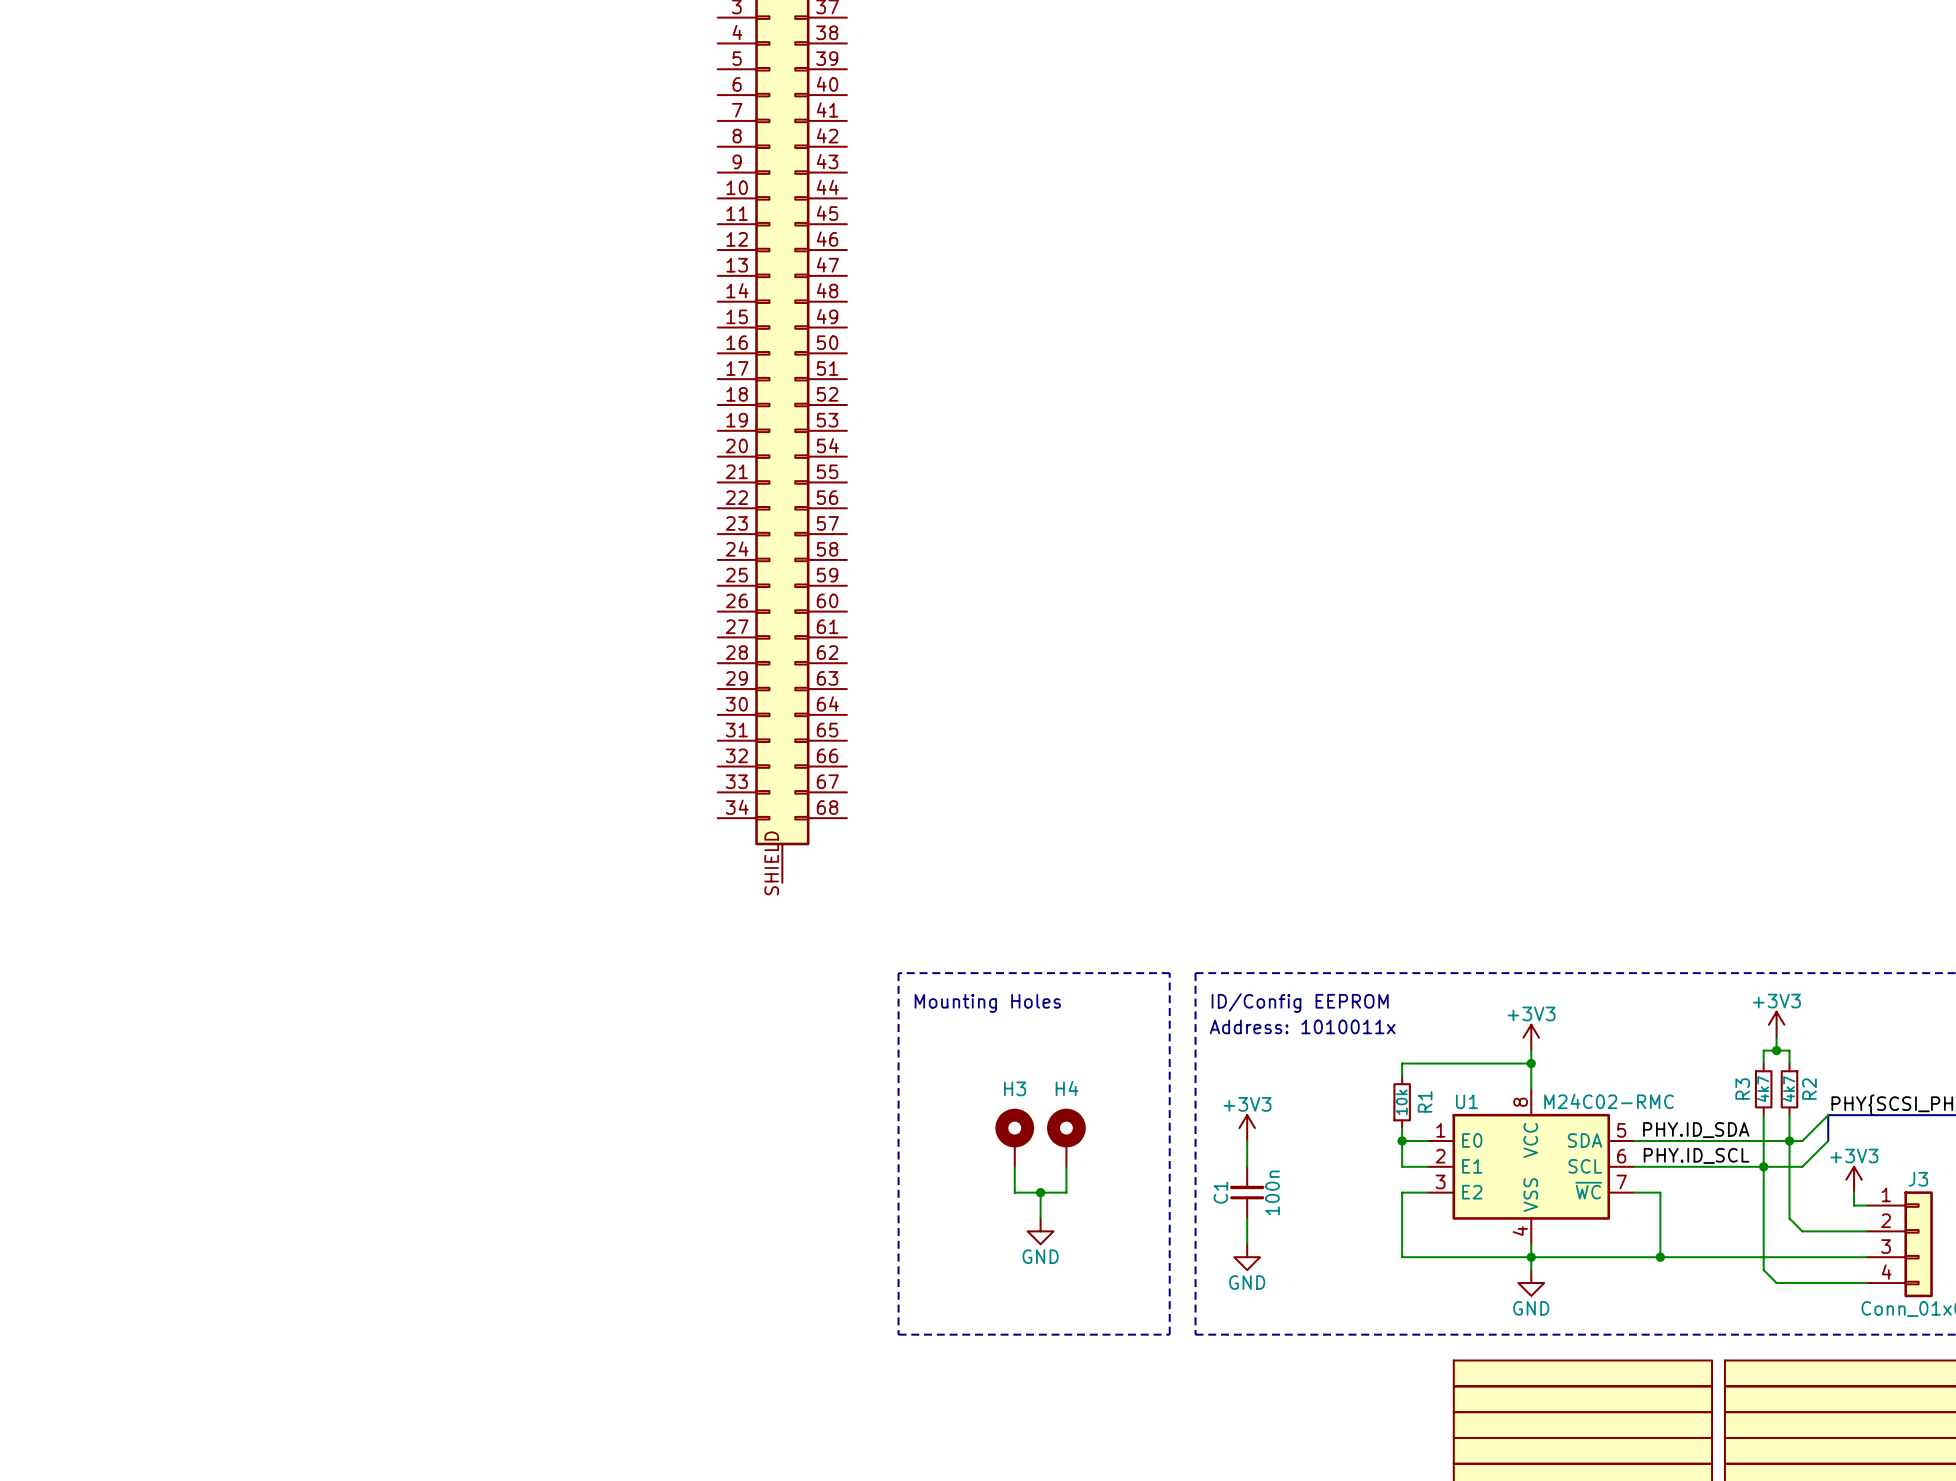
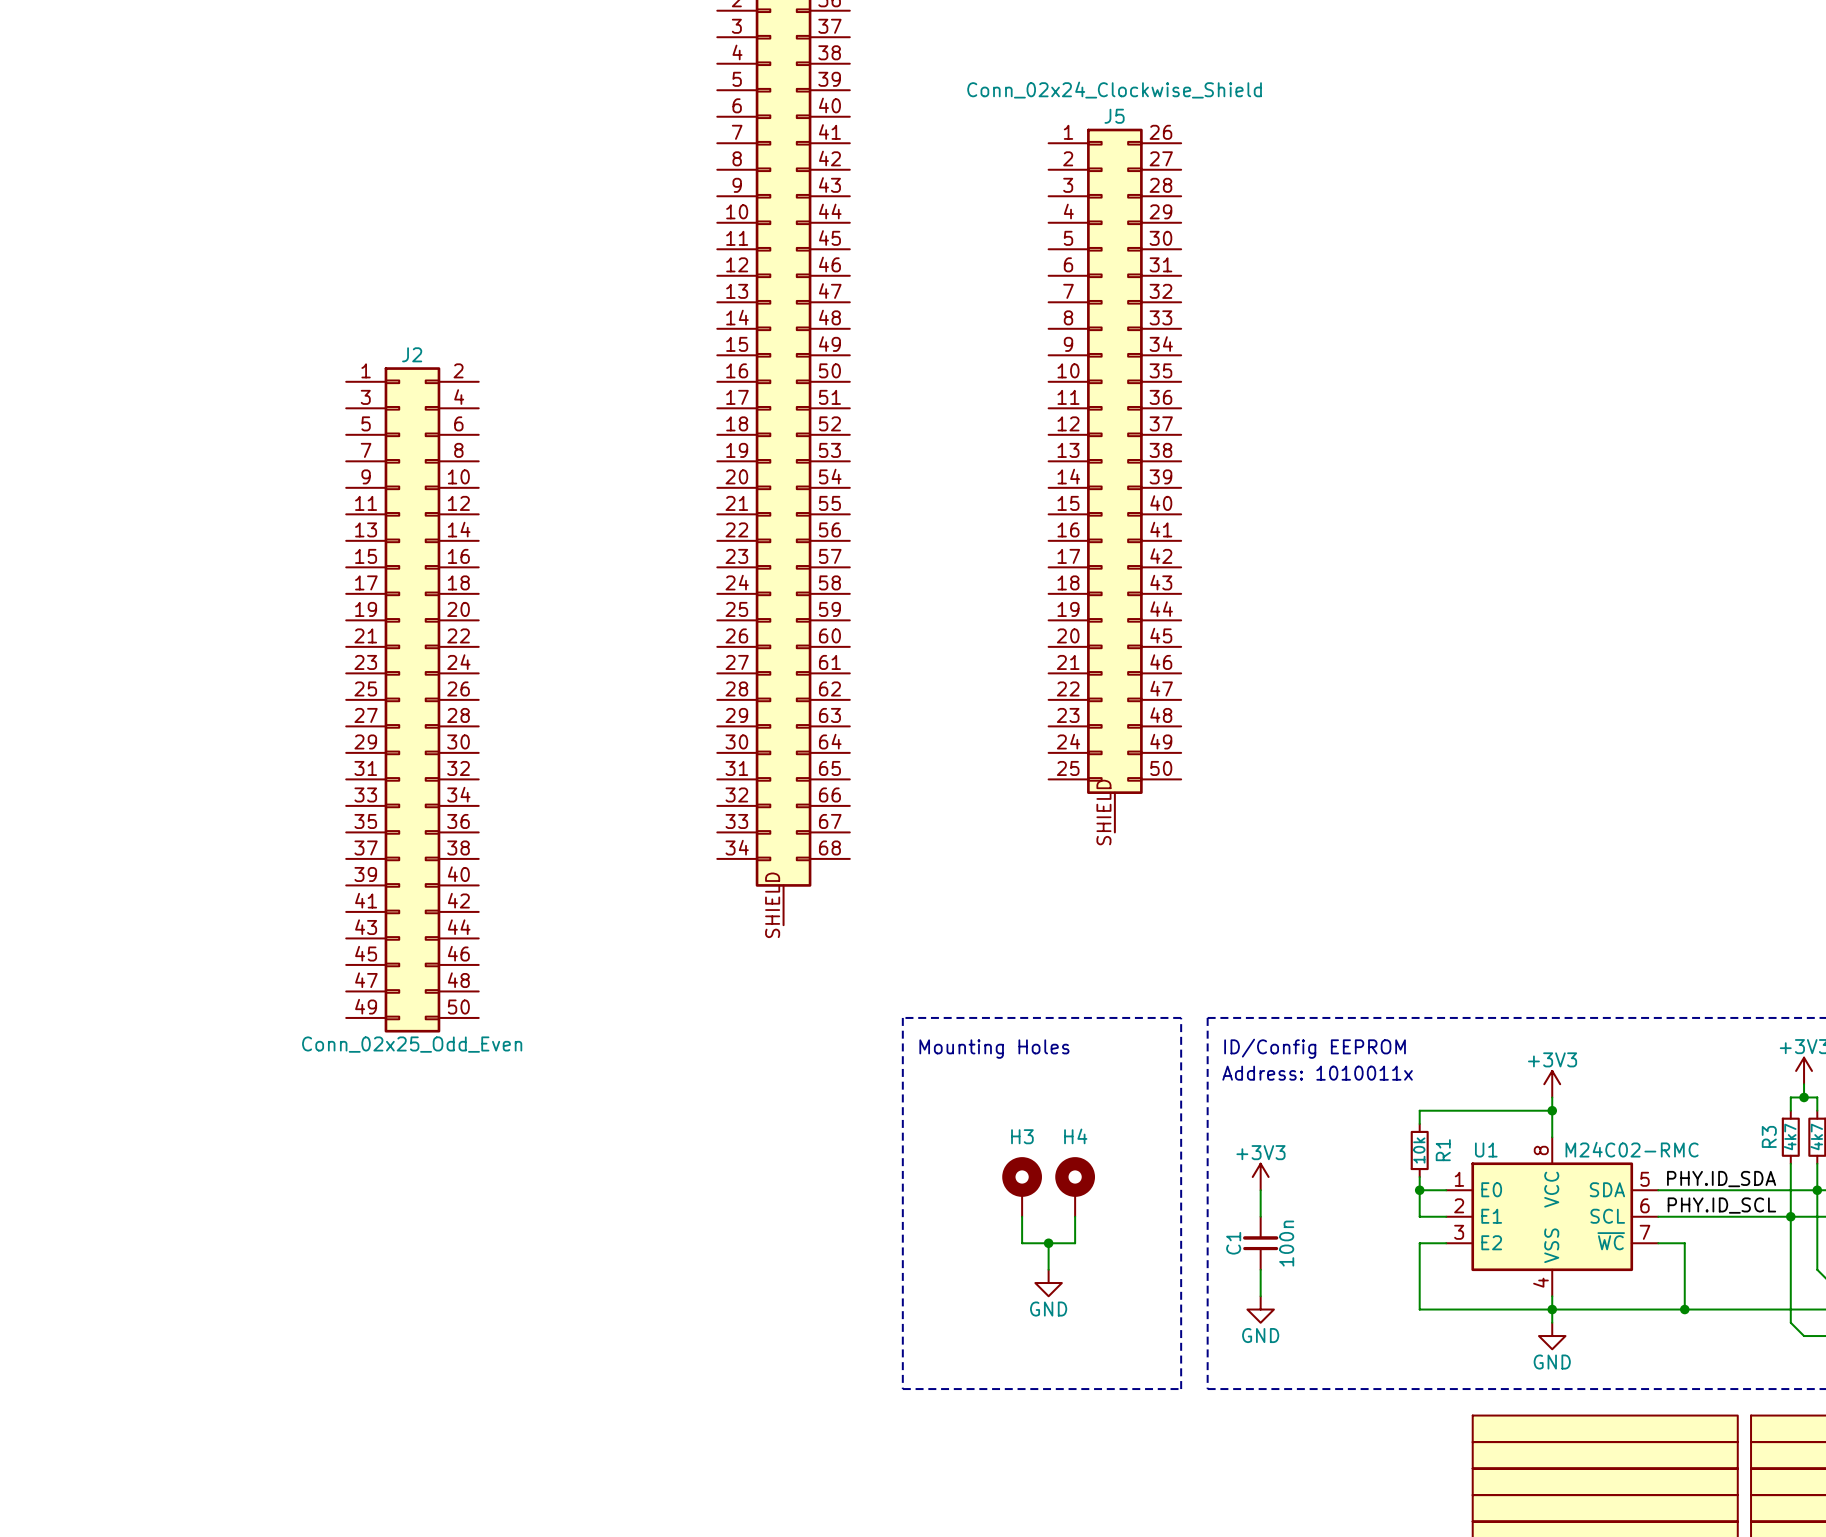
J5: none -> Conn_02x24_Clockwise_Shield (1114, 480)
J2: none -> Conn_02x25_Odd_Even (412, 699)

